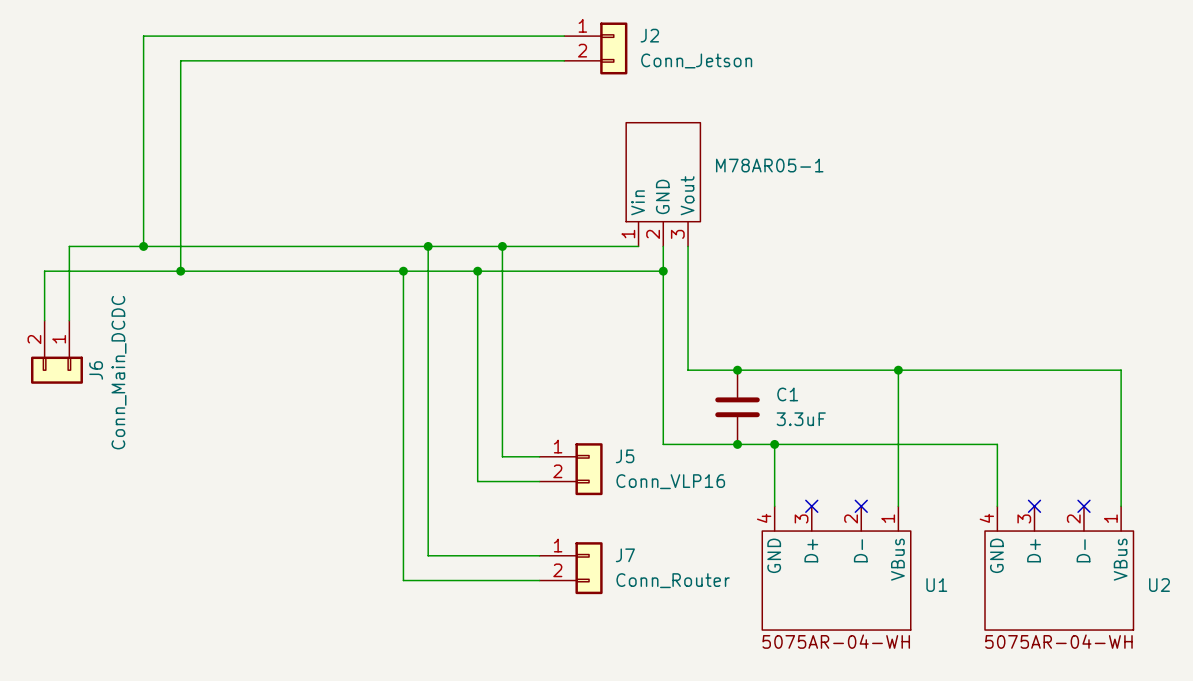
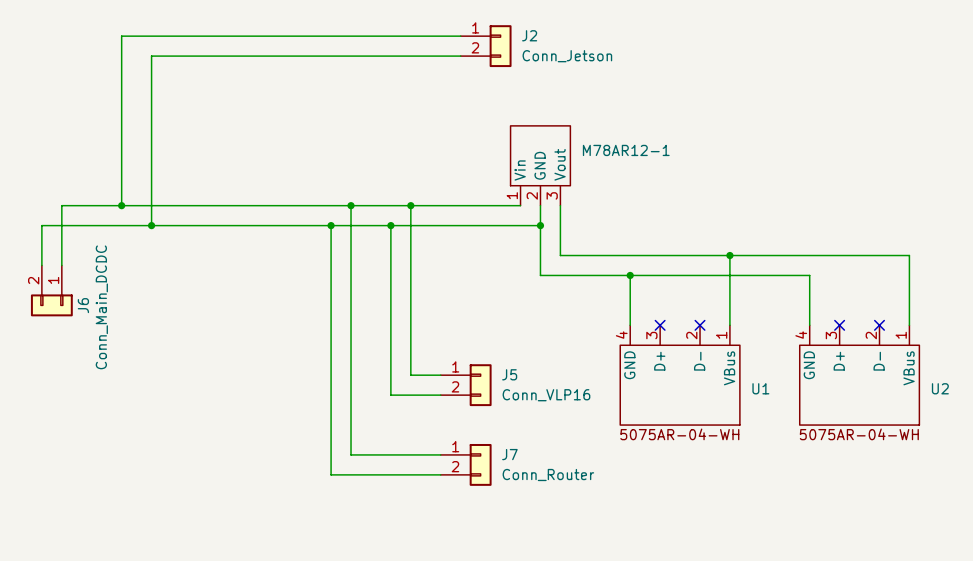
M78AR05-1: (663, 184) -> none
M78AR12-1: none -> (540, 165)
wire: (688, 308) (688, 370) (1121, 370) -> (560, 255) (909, 255) (909, 305)
wire: none -> (729, 255) (729, 305)
junction: none -> (729, 255)
wire: (663, 333) (663, 444) (997, 444) (997, 506) -> (540, 275) (809, 275) (809, 325)
junction position: (737, 370) -> (630, 275)
junction: (898, 370) -> none
no-connect mark: none -> (660, 325)
no-connect mark: none -> (700, 325)
wire: (898, 394) (898, 506) -> none
no-connect mark: none -> (839, 325)
no-connect mark: none -> (879, 325)
wire: (1121, 394) (1121, 506) -> none
C1: 3.3uF (737, 407) -> none
junction: (737, 444) -> none
wire: (774, 444) (774, 506) -> (630, 275) (630, 325)
junction: (774, 444) -> none
no-connect mark: (811, 506) -> none
no-connect mark: (861, 506) -> none
no-connect mark: (1034, 506) -> none
no-connect mark: (1083, 506) -> none
U1 position: (836, 568) -> (680, 375)
U2 position: (1059, 568) -> (859, 375)

